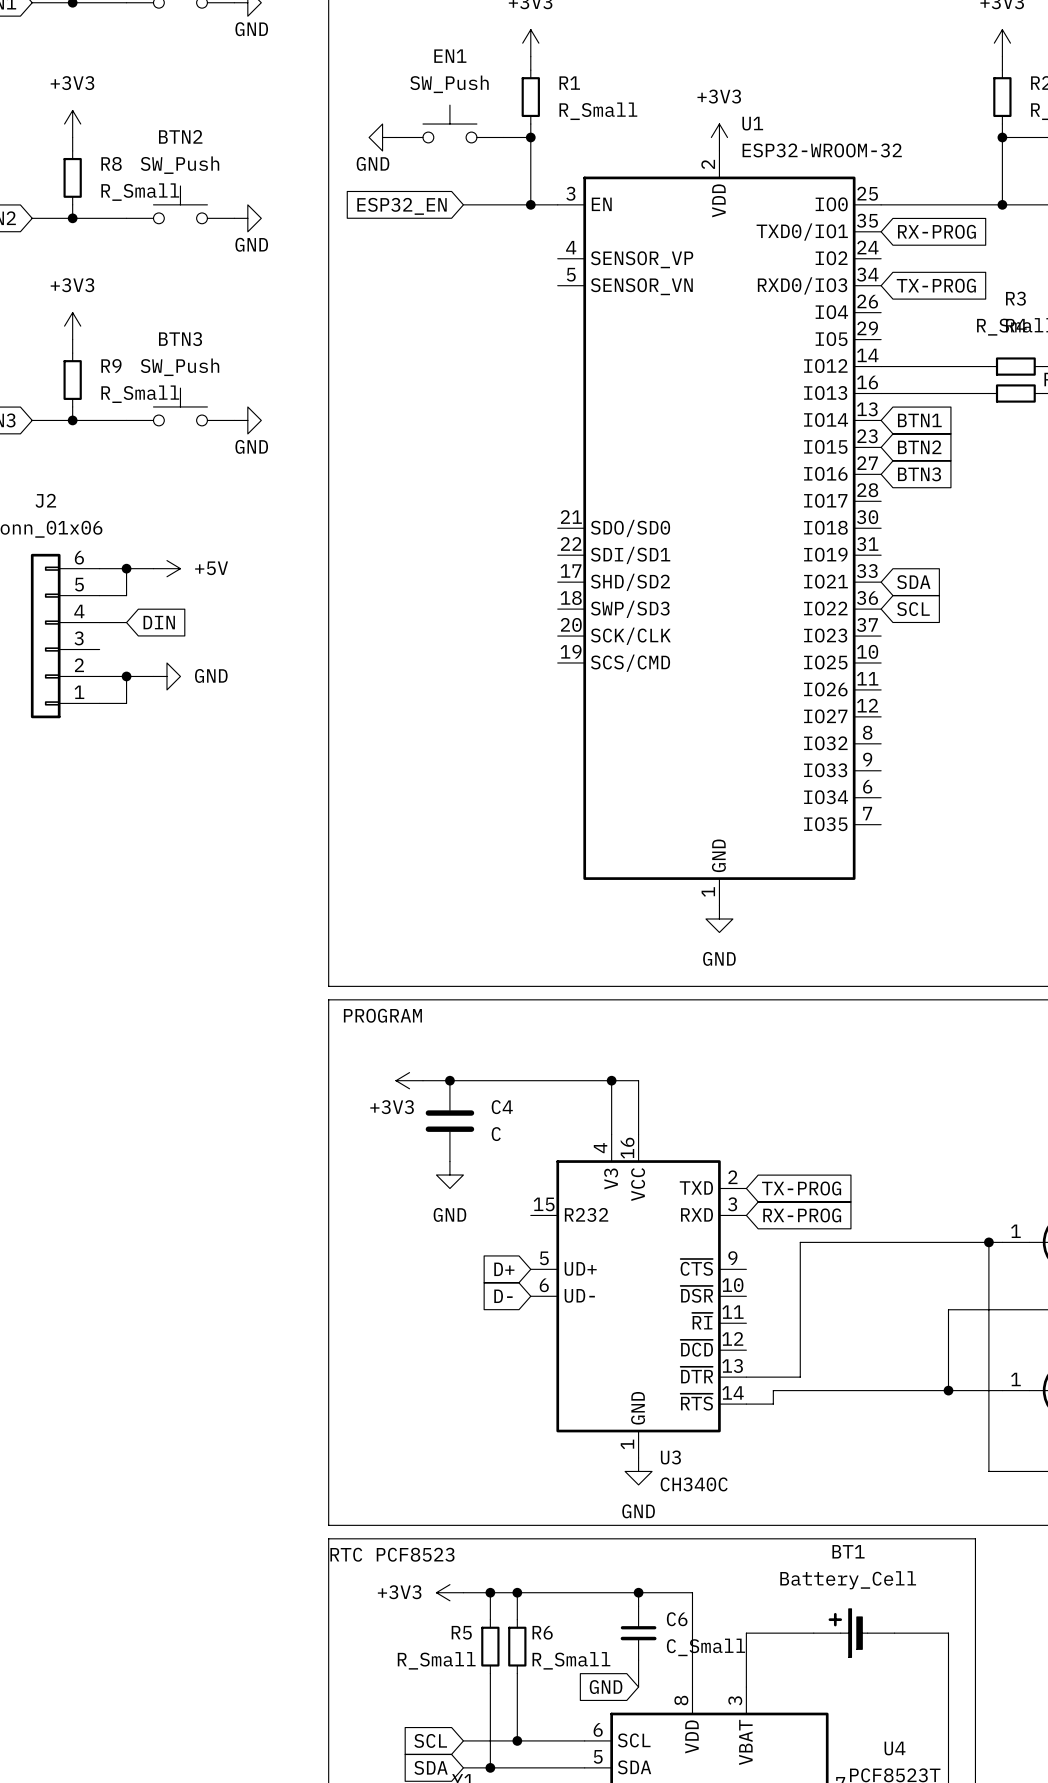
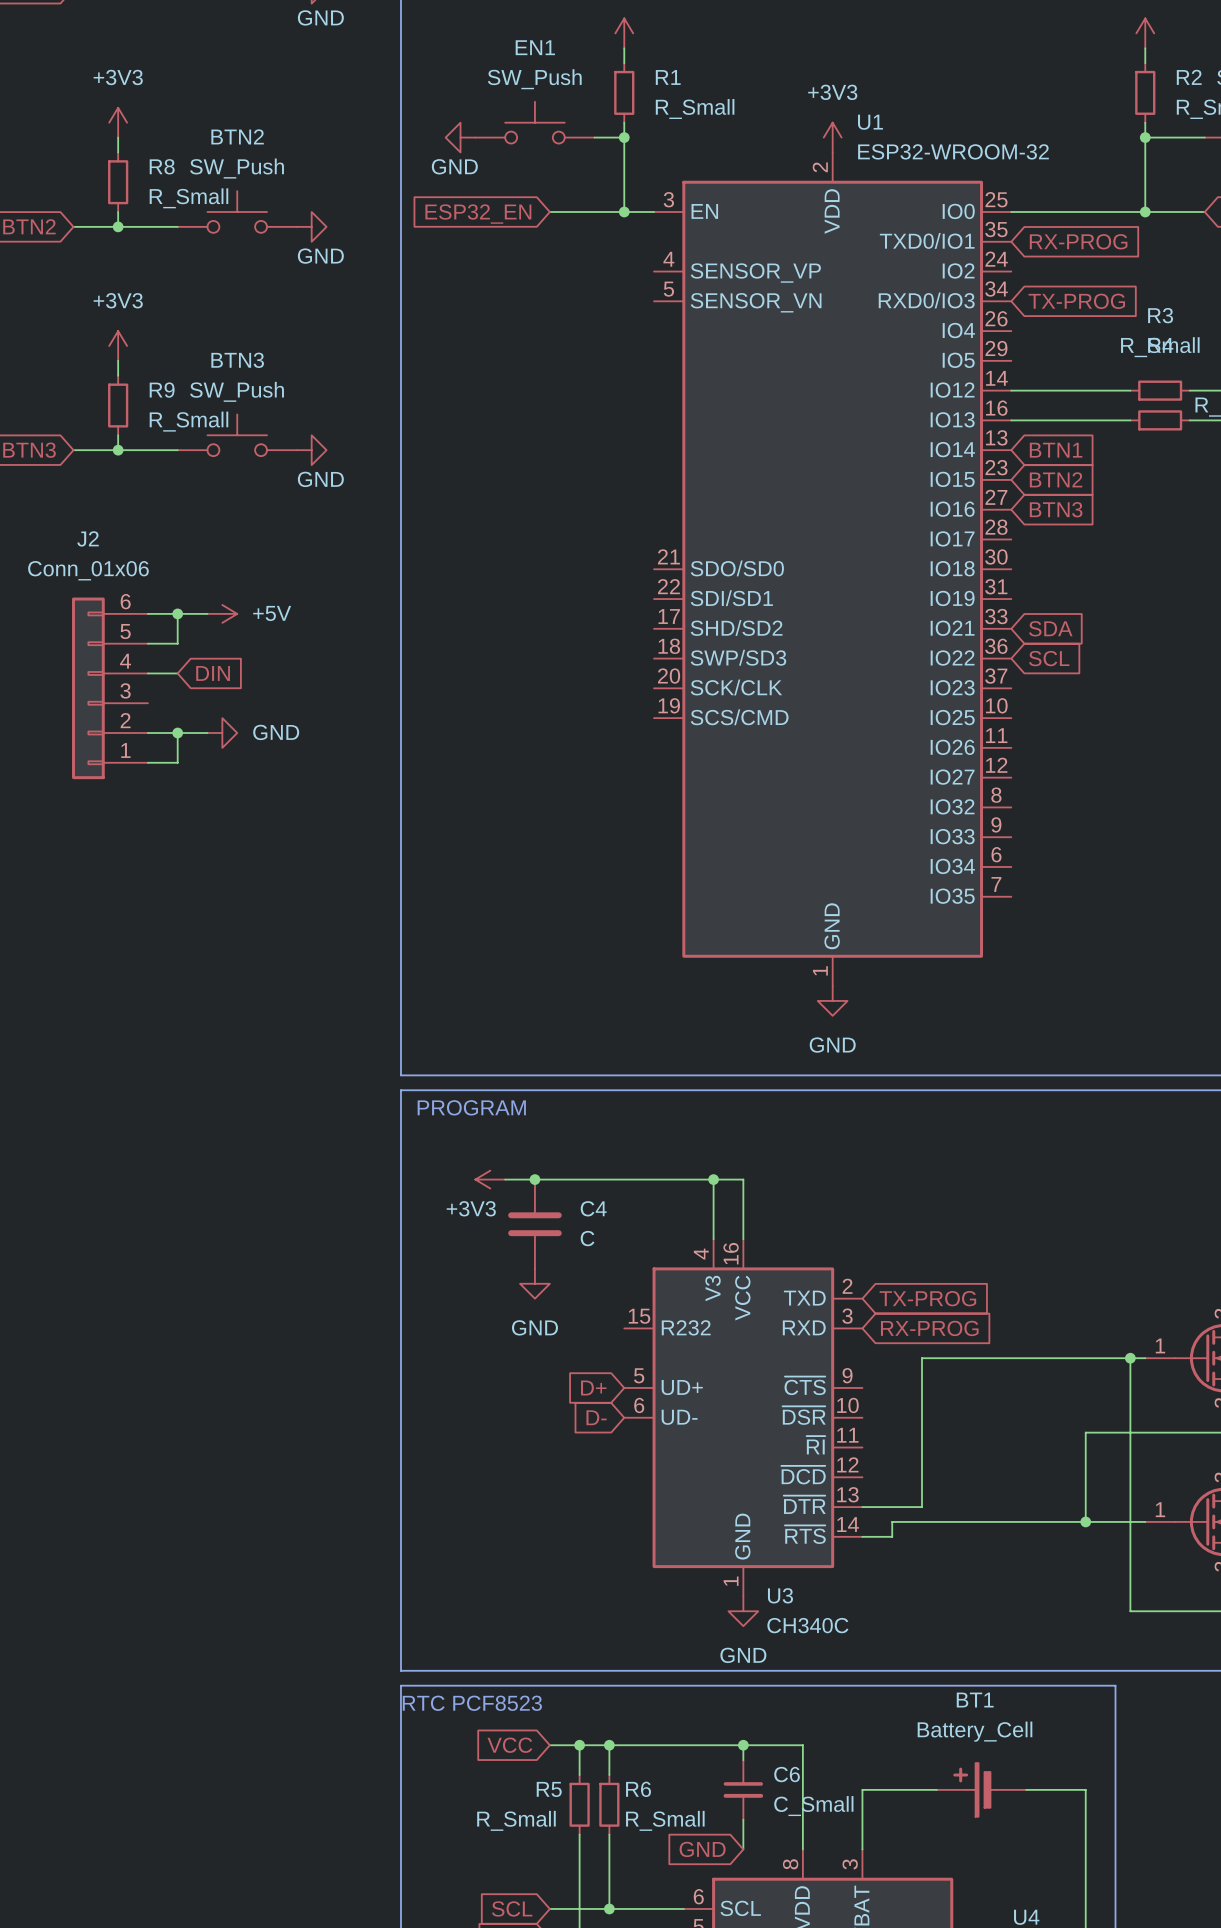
global label: none -> VCC (509, 1745)
power symbol: +3V3 (449, 1592) -> none

